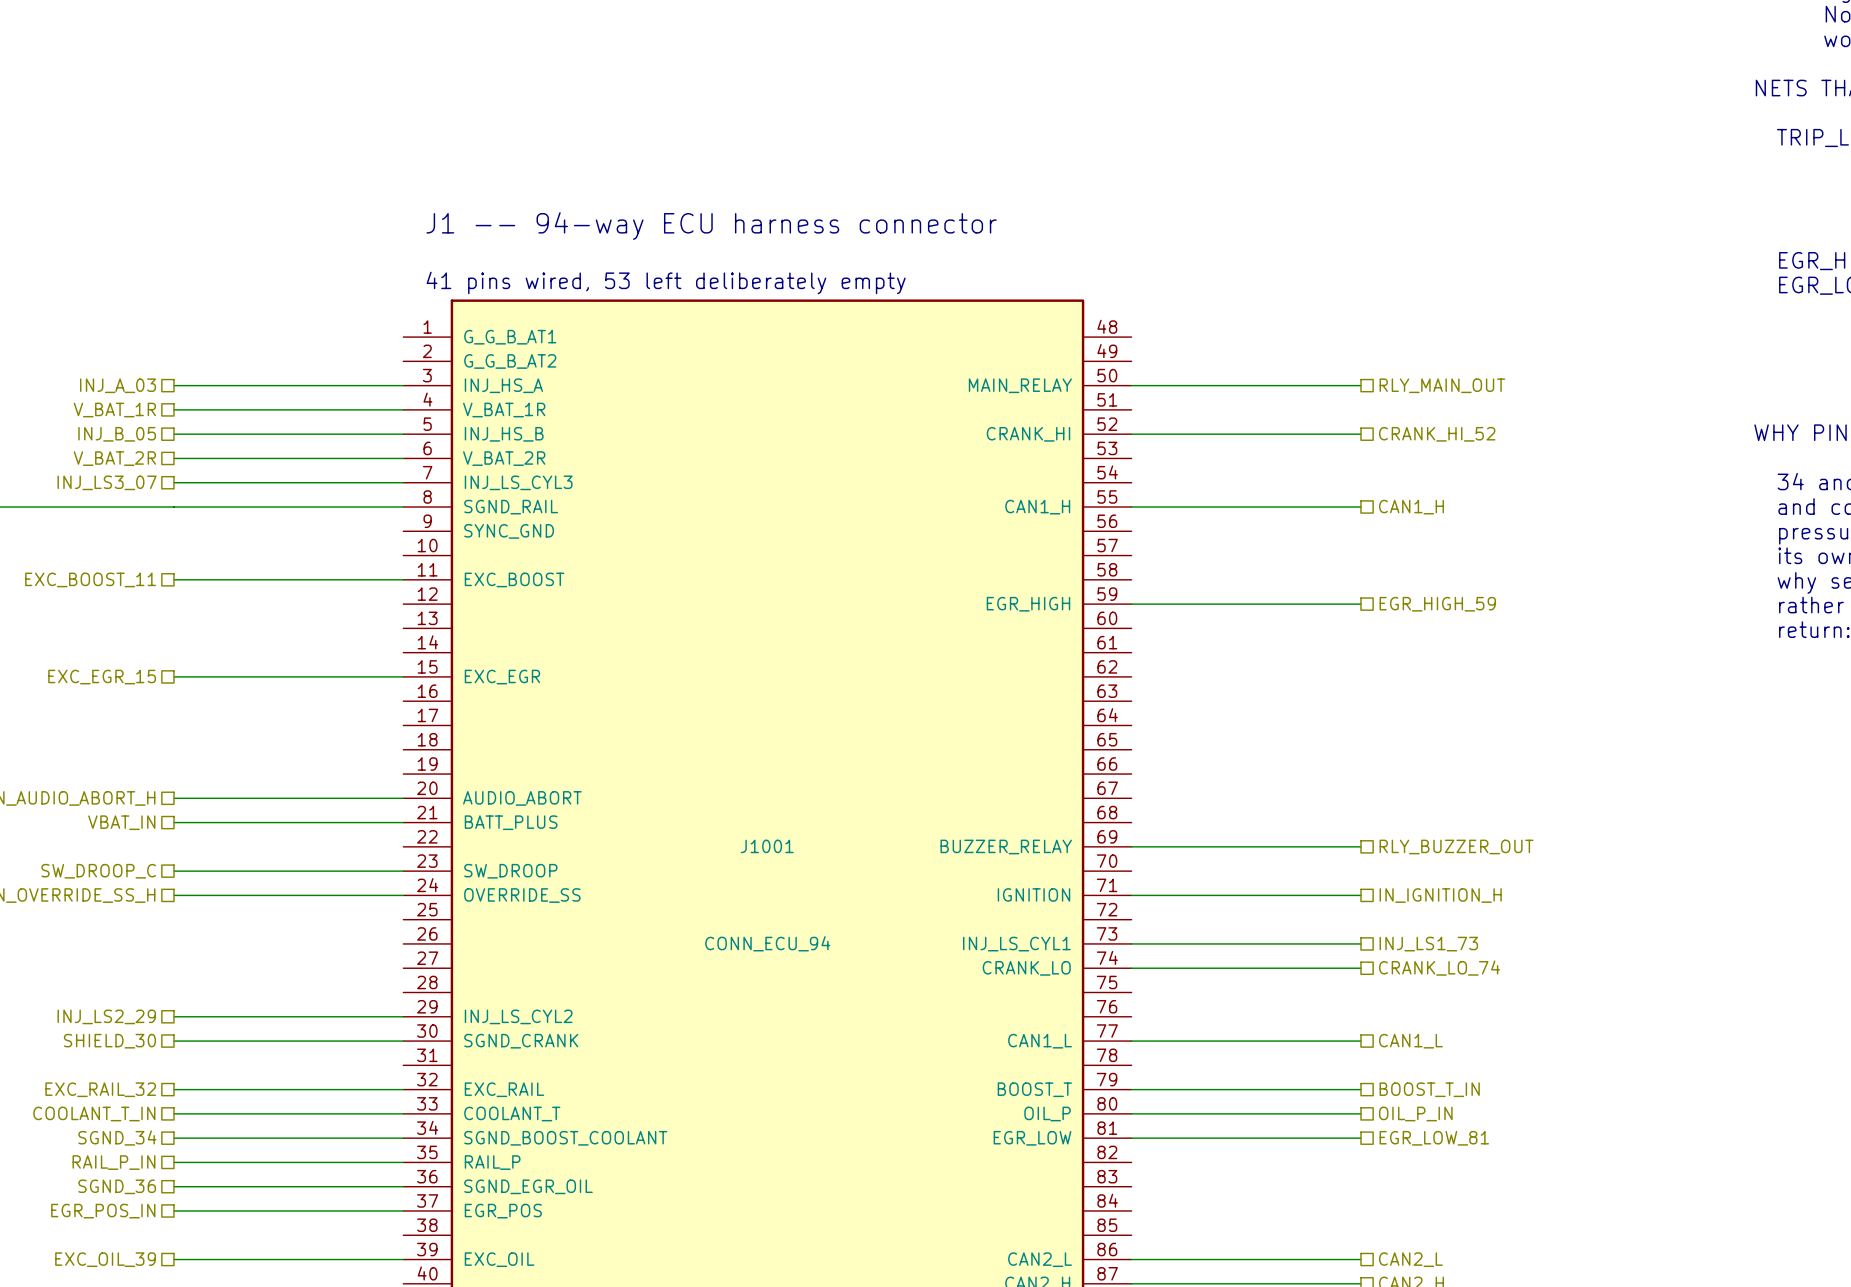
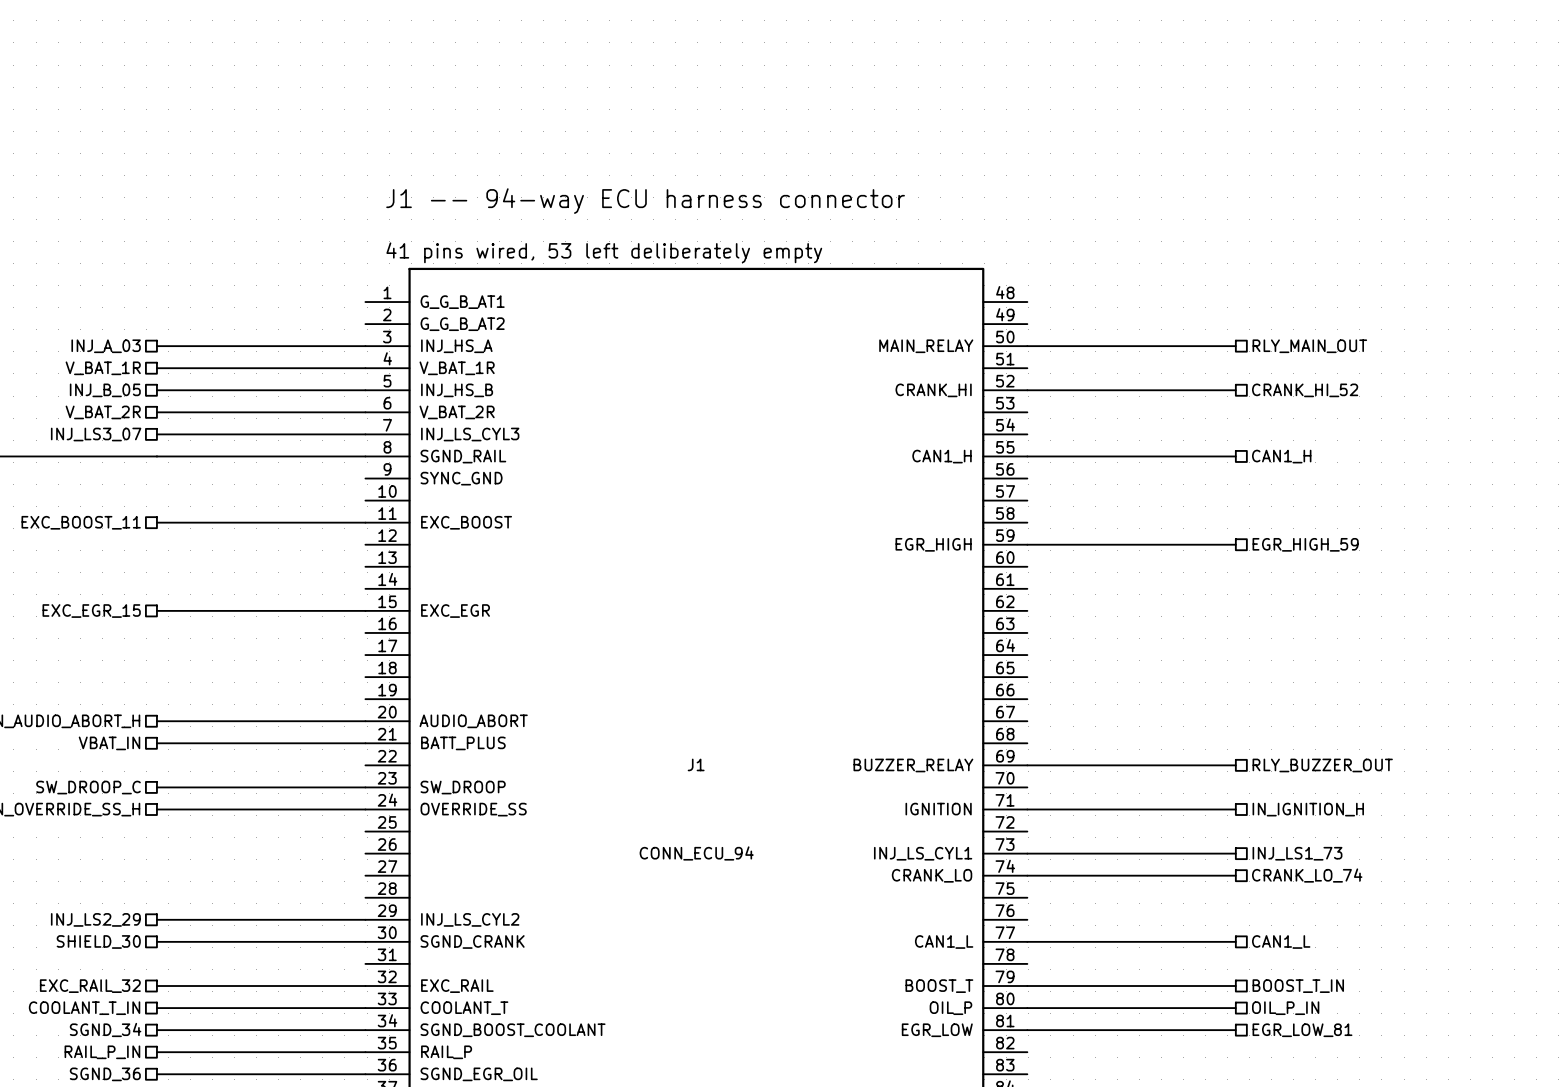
J1001 name: J1001 (767, 846) -> J1 (696, 764)

